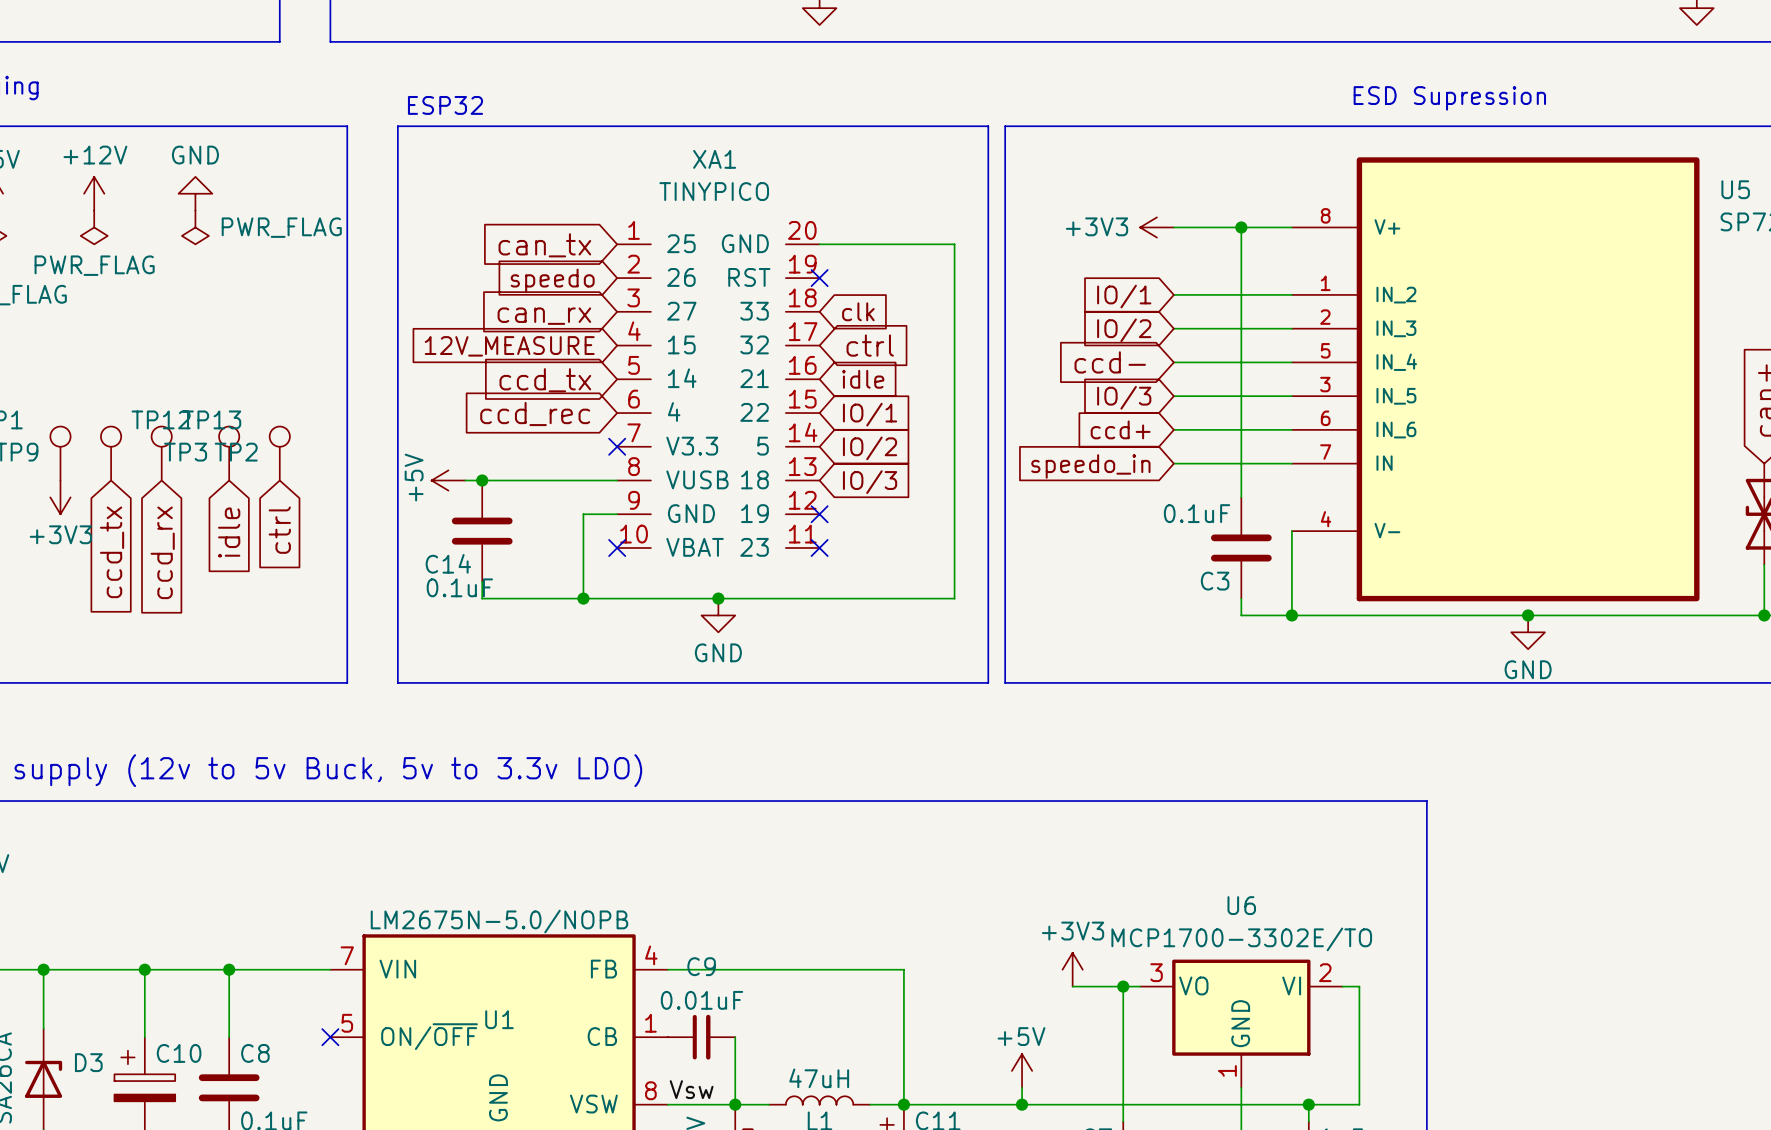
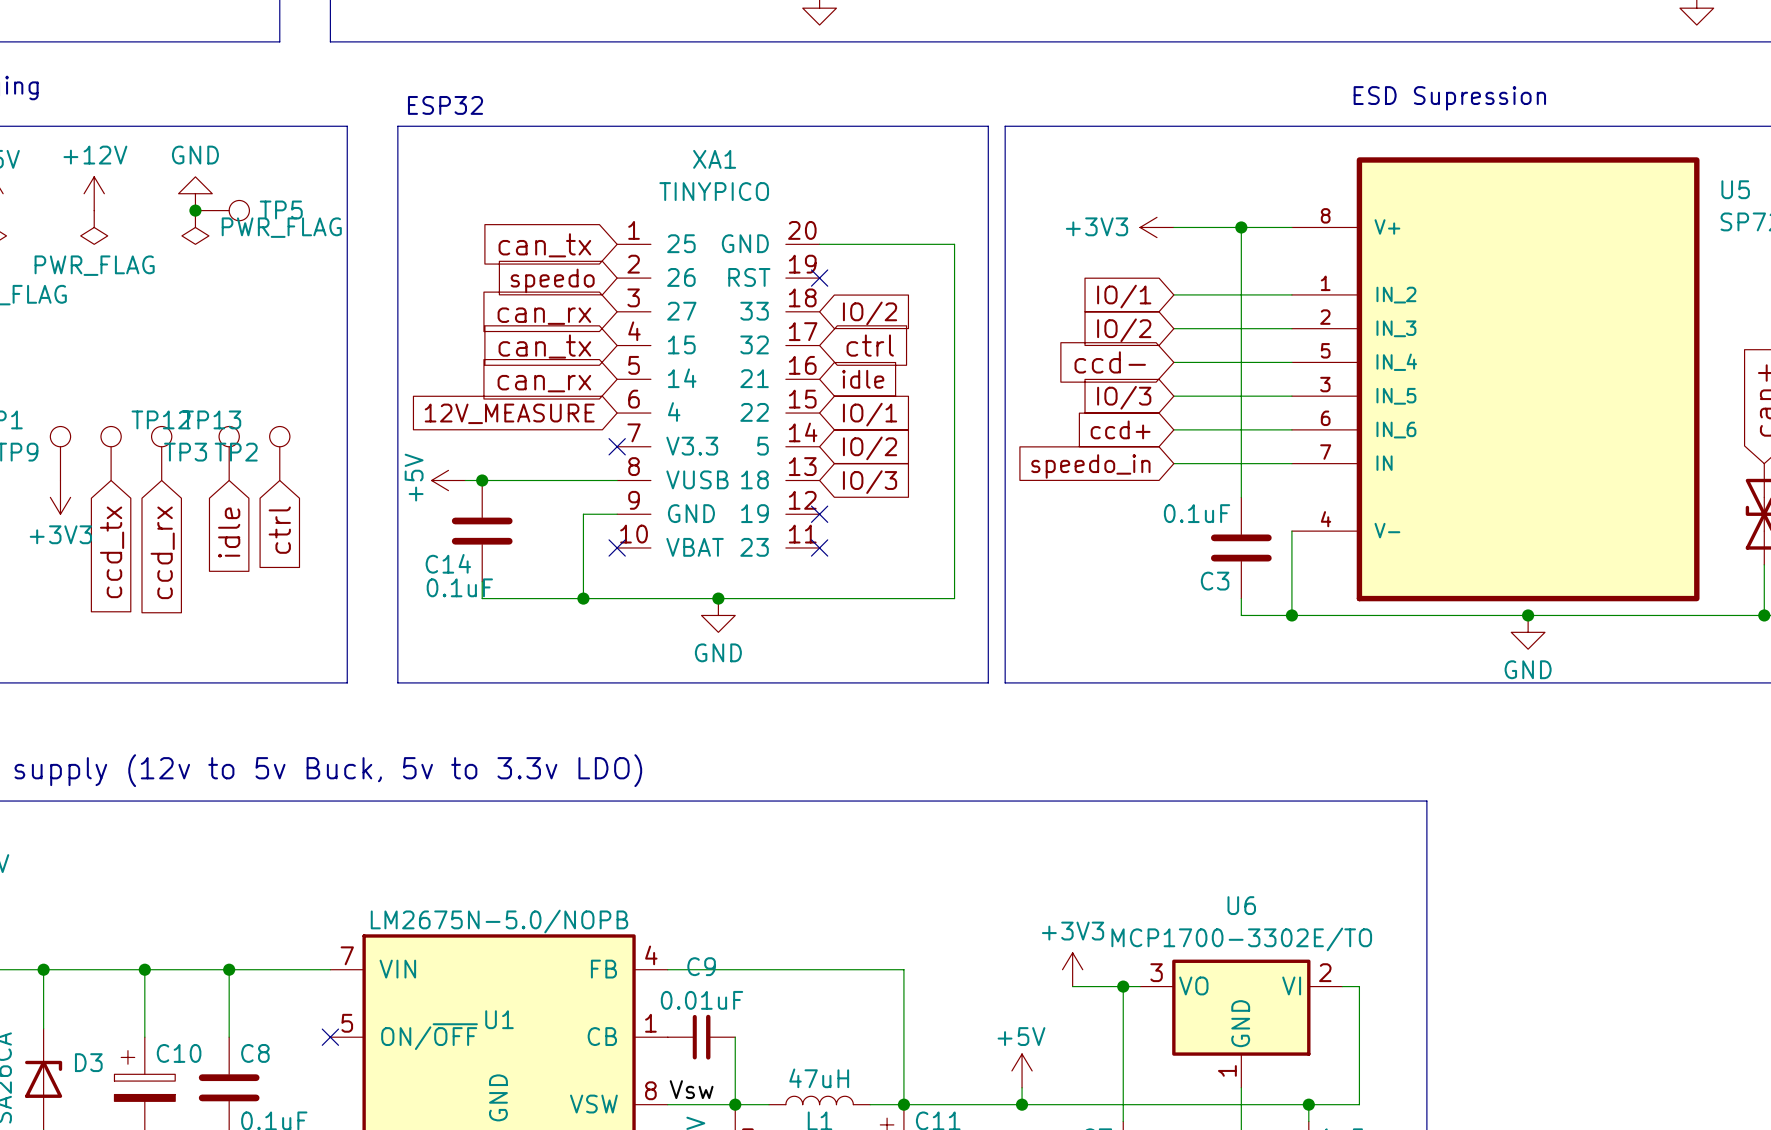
junction: none -> (195, 210)
TP5: none -> (222, 210)
global label: clk (858, 311) -> IO/2 (870, 313)
global label: 12V_MEASURE (509, 346) -> can_tx (544, 346)
global label: ccd_tx (545, 380) -> can_rx (544, 383)
global label: ccd_rec (535, 413) -> 12V_MEASURE (509, 413)

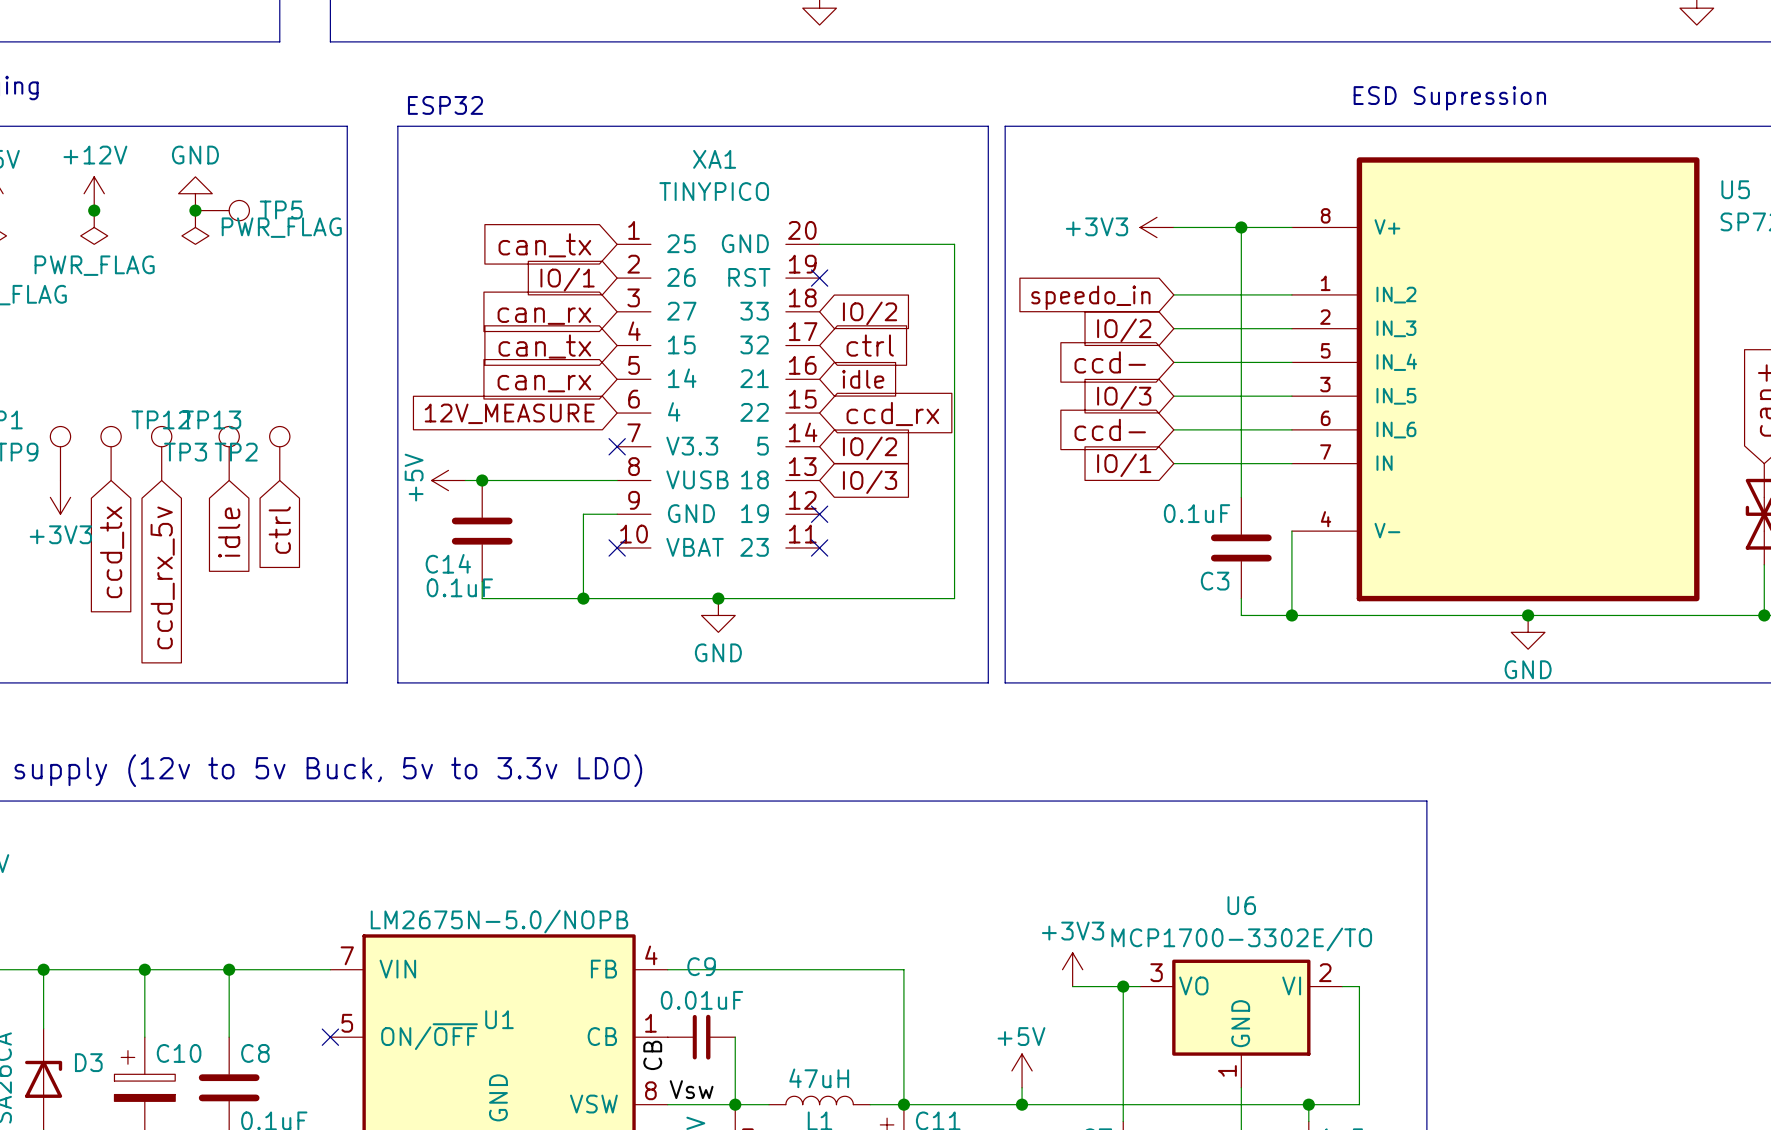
junction: none -> (94, 210)
global label: speedo (552, 280) -> IO/1 (567, 279)
global label: IO/1 (1124, 296) -> speedo_in (1090, 297)
global label: IO/1 (870, 414) -> ccd_rx (892, 413)
global label: ccd+ (1120, 429) -> ccd- (1110, 429)
global label: speedo_in (1090, 466) -> IO/1 (1124, 465)
global label: ccd_rx (162, 552) -> ccd_rx_5v (162, 577)
label: none -> CB (652, 1055)

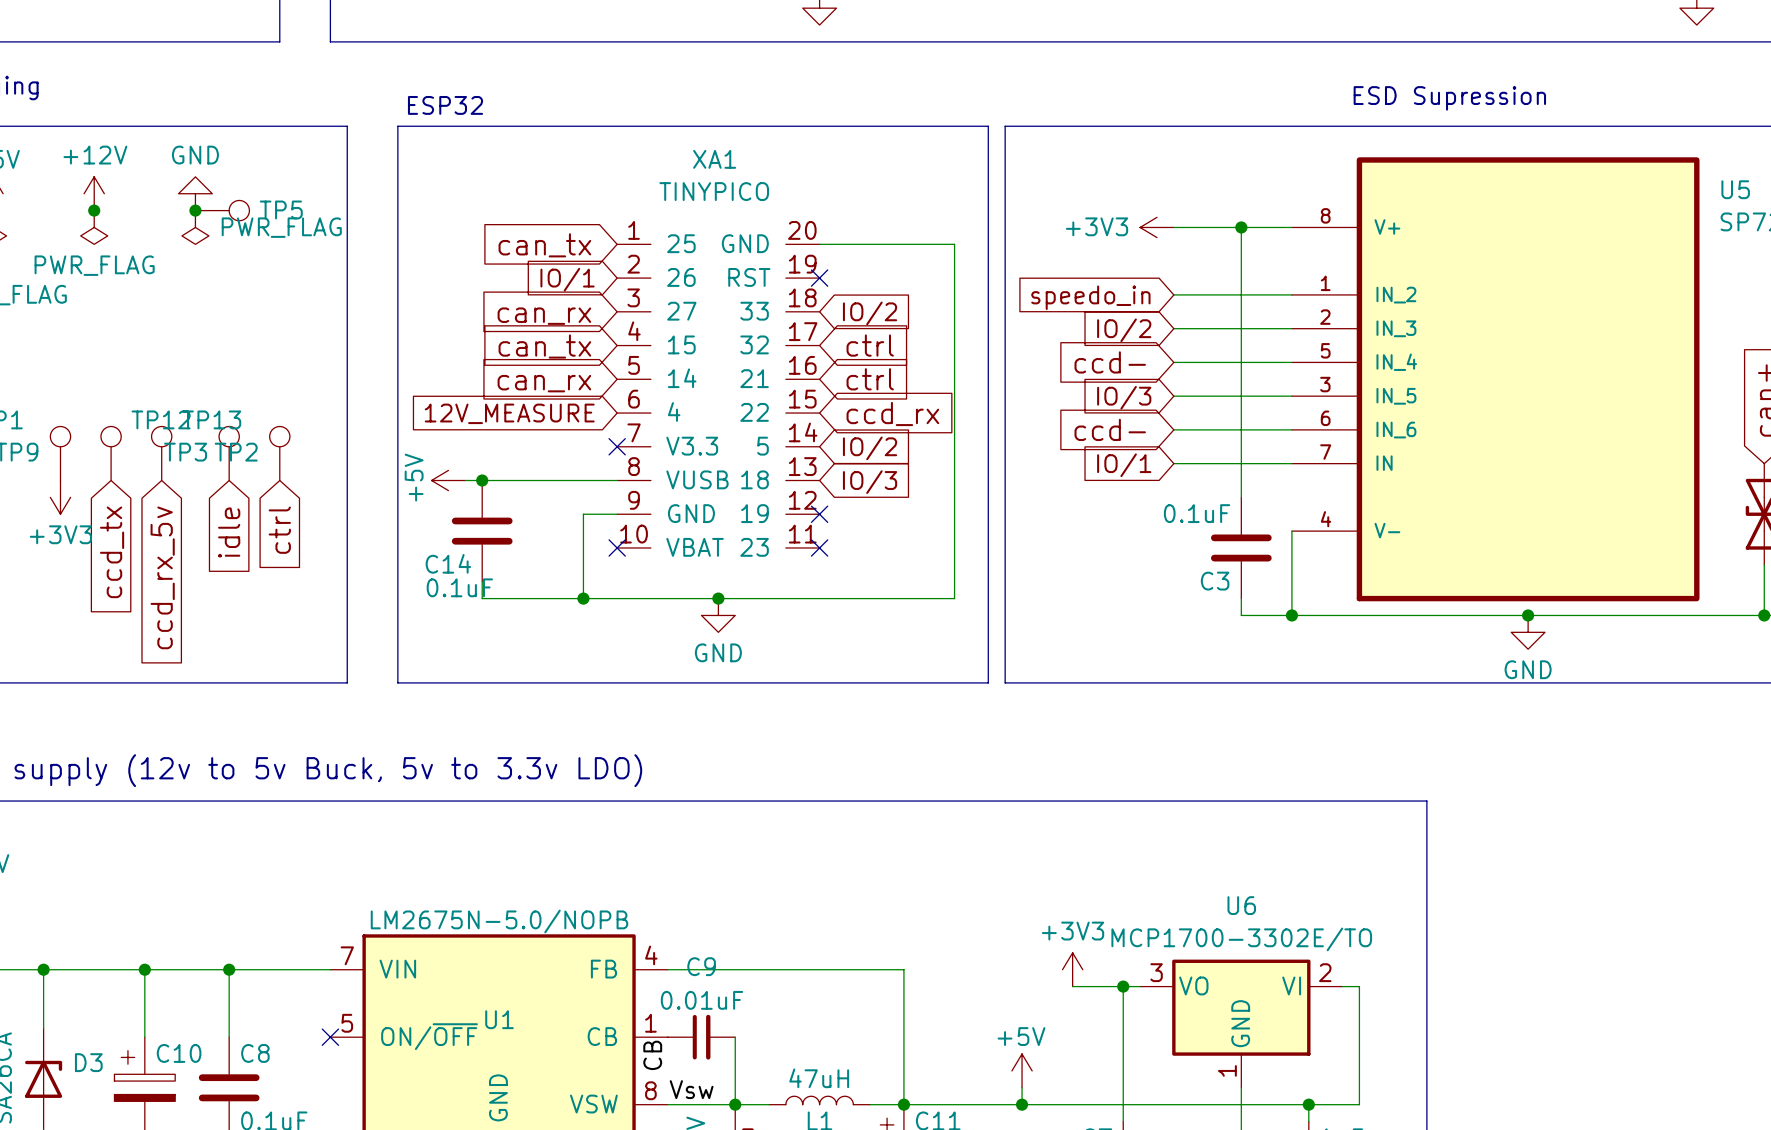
global label: idle (863, 379) -> ctrl (870, 379)

